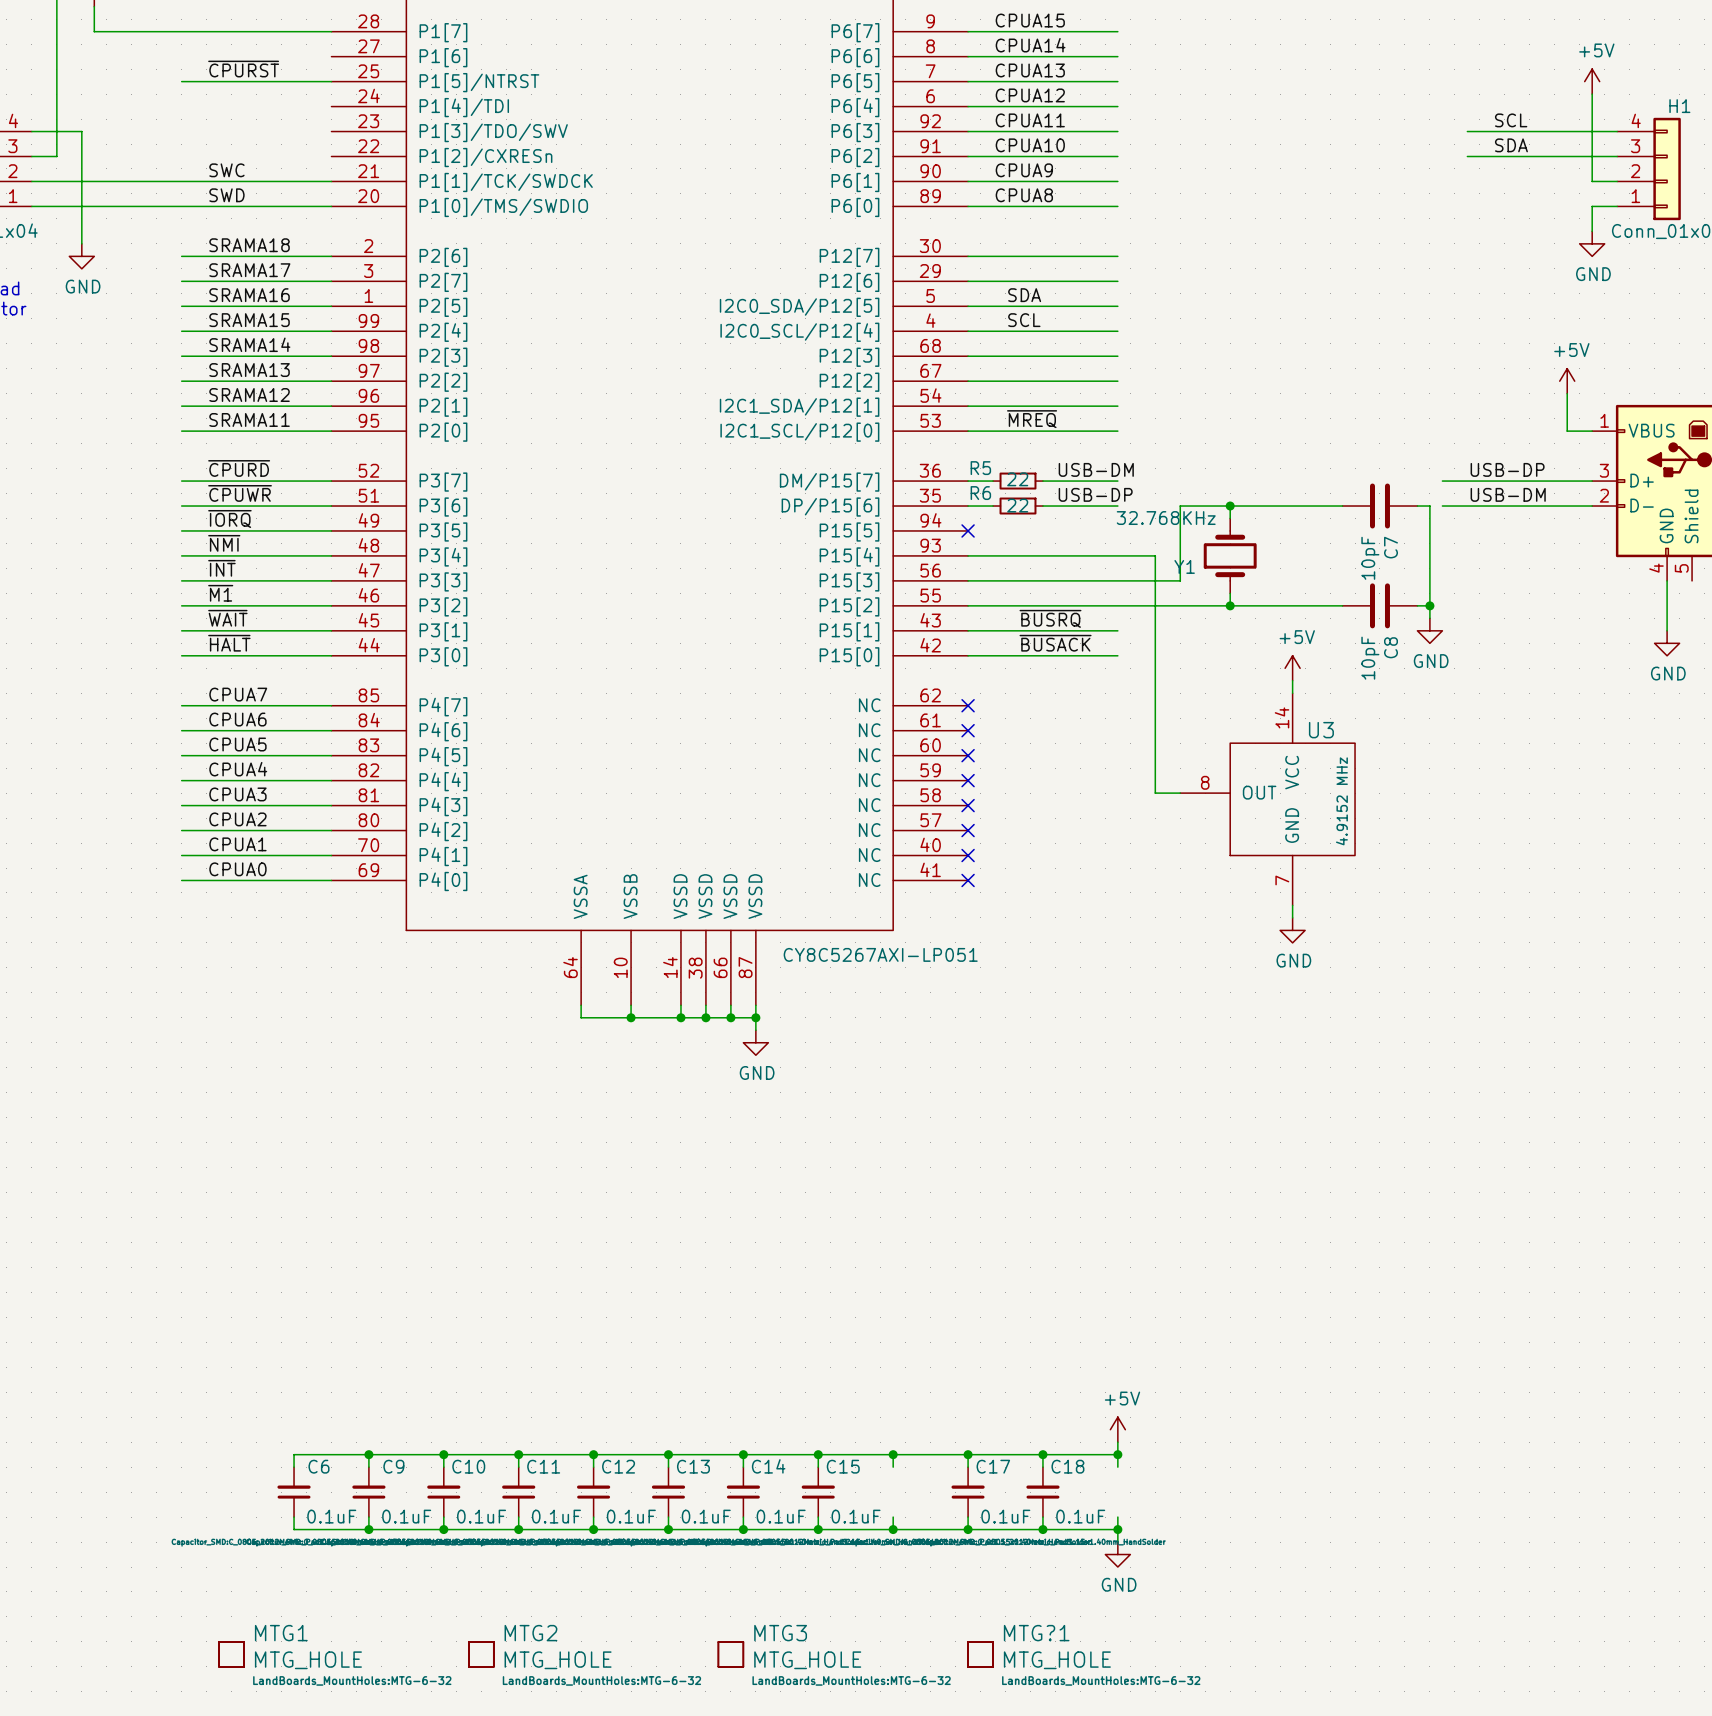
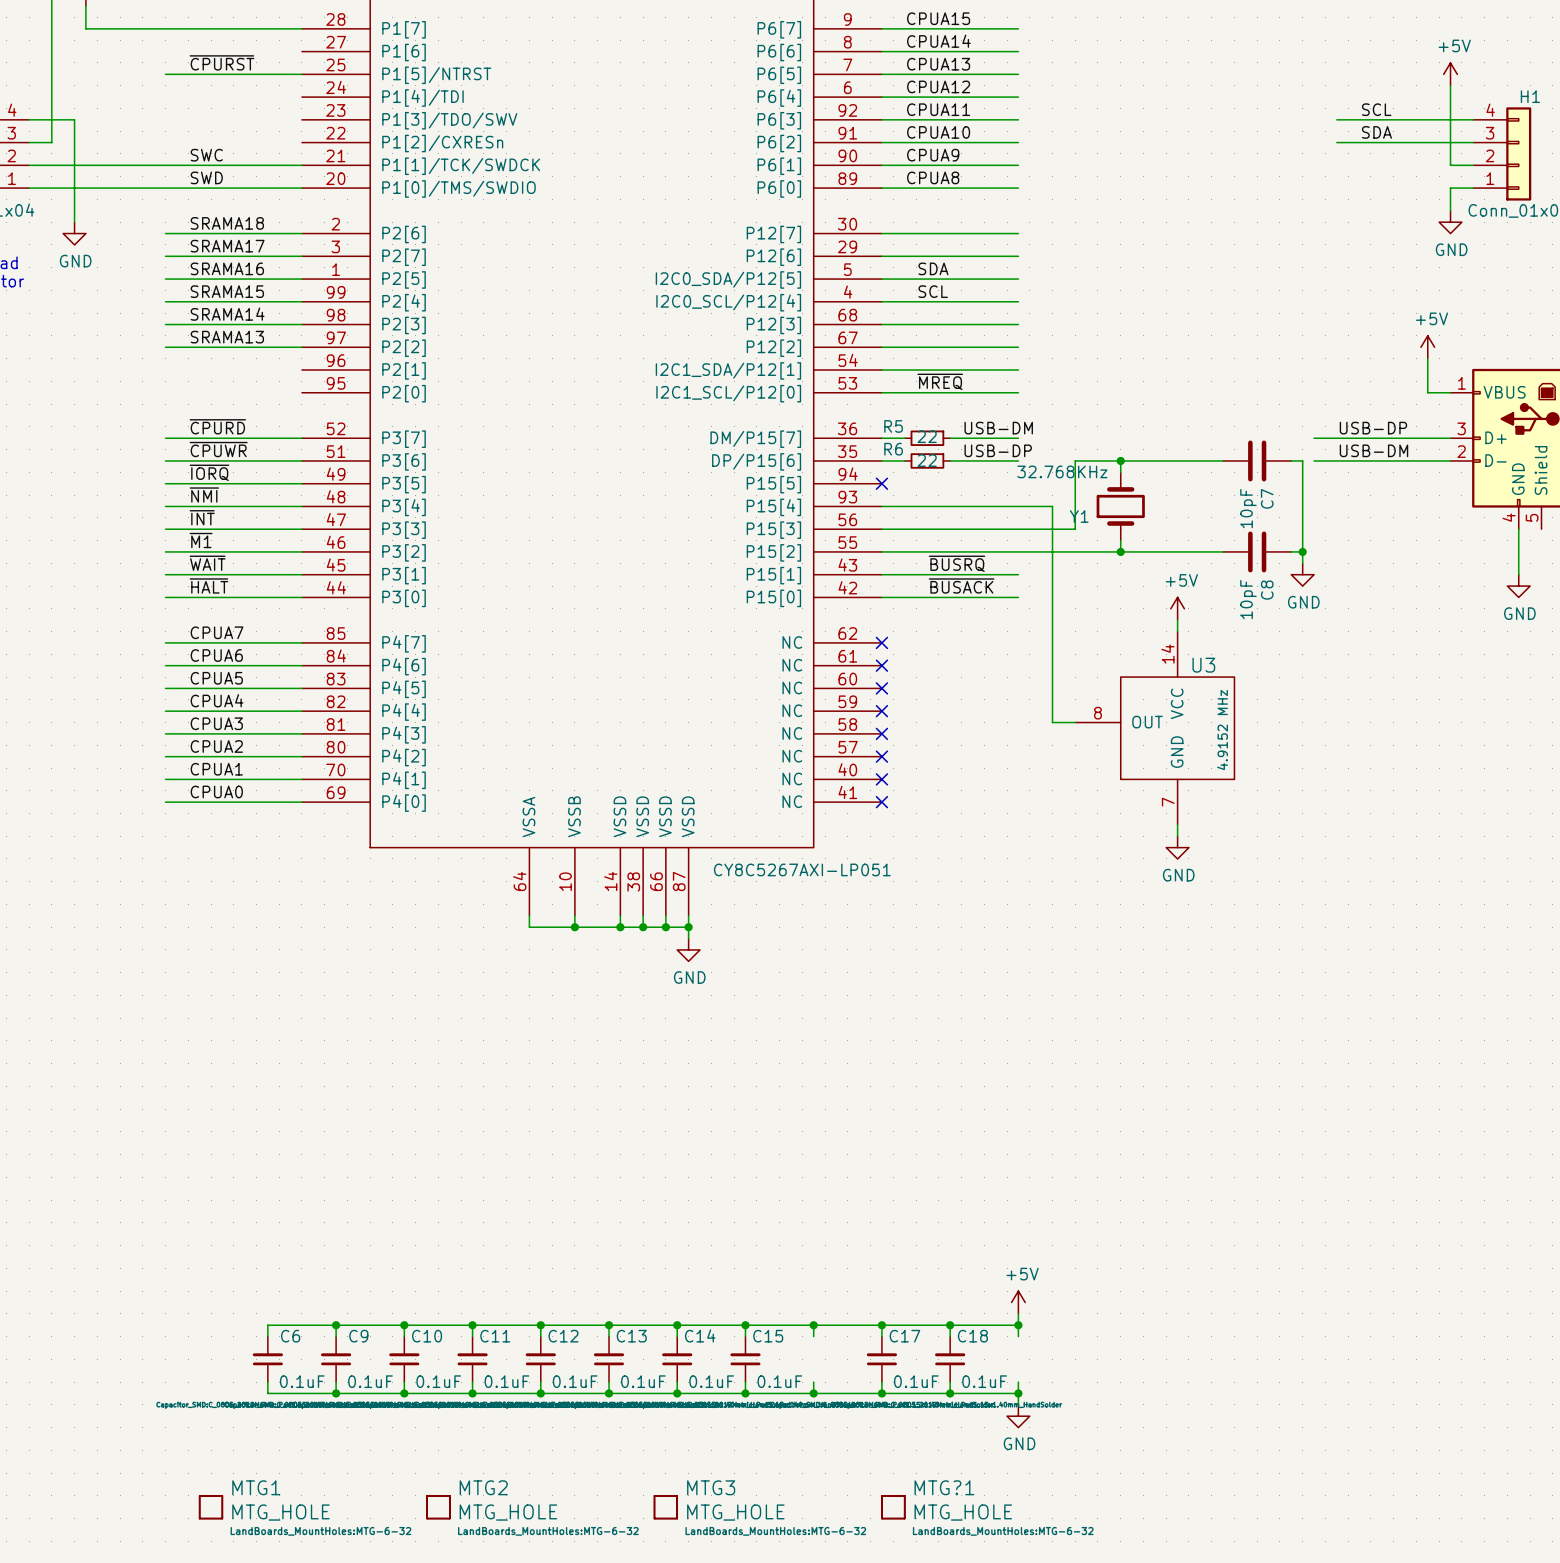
label: SRAMA12 (249, 395) -> none
wire: (181, 406) (331, 406) -> none
label: SRAMA11 (249, 419) -> none
wire: (181, 431) (331, 431) -> none

